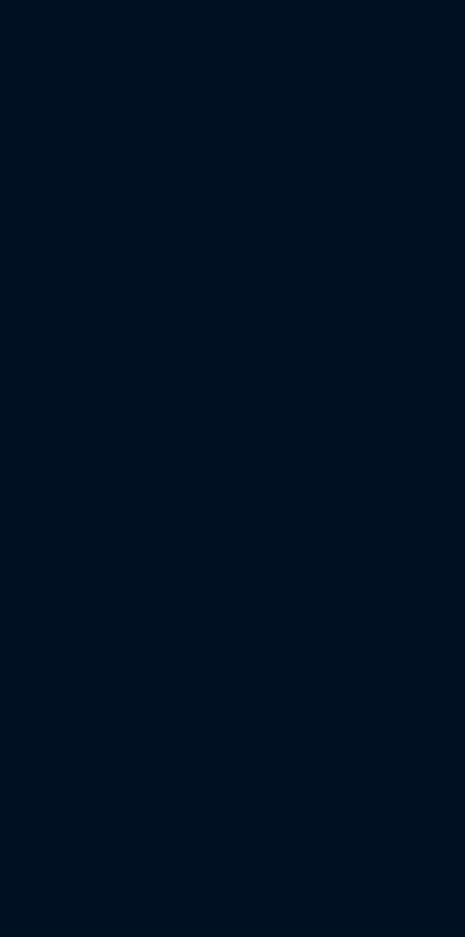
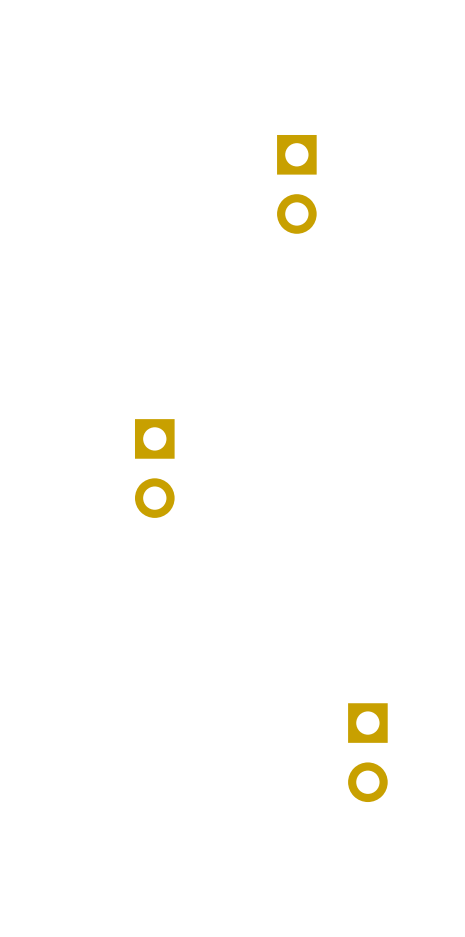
part: none -> (296, 184)
part: none -> (154, 468)
part: none -> (367, 752)

